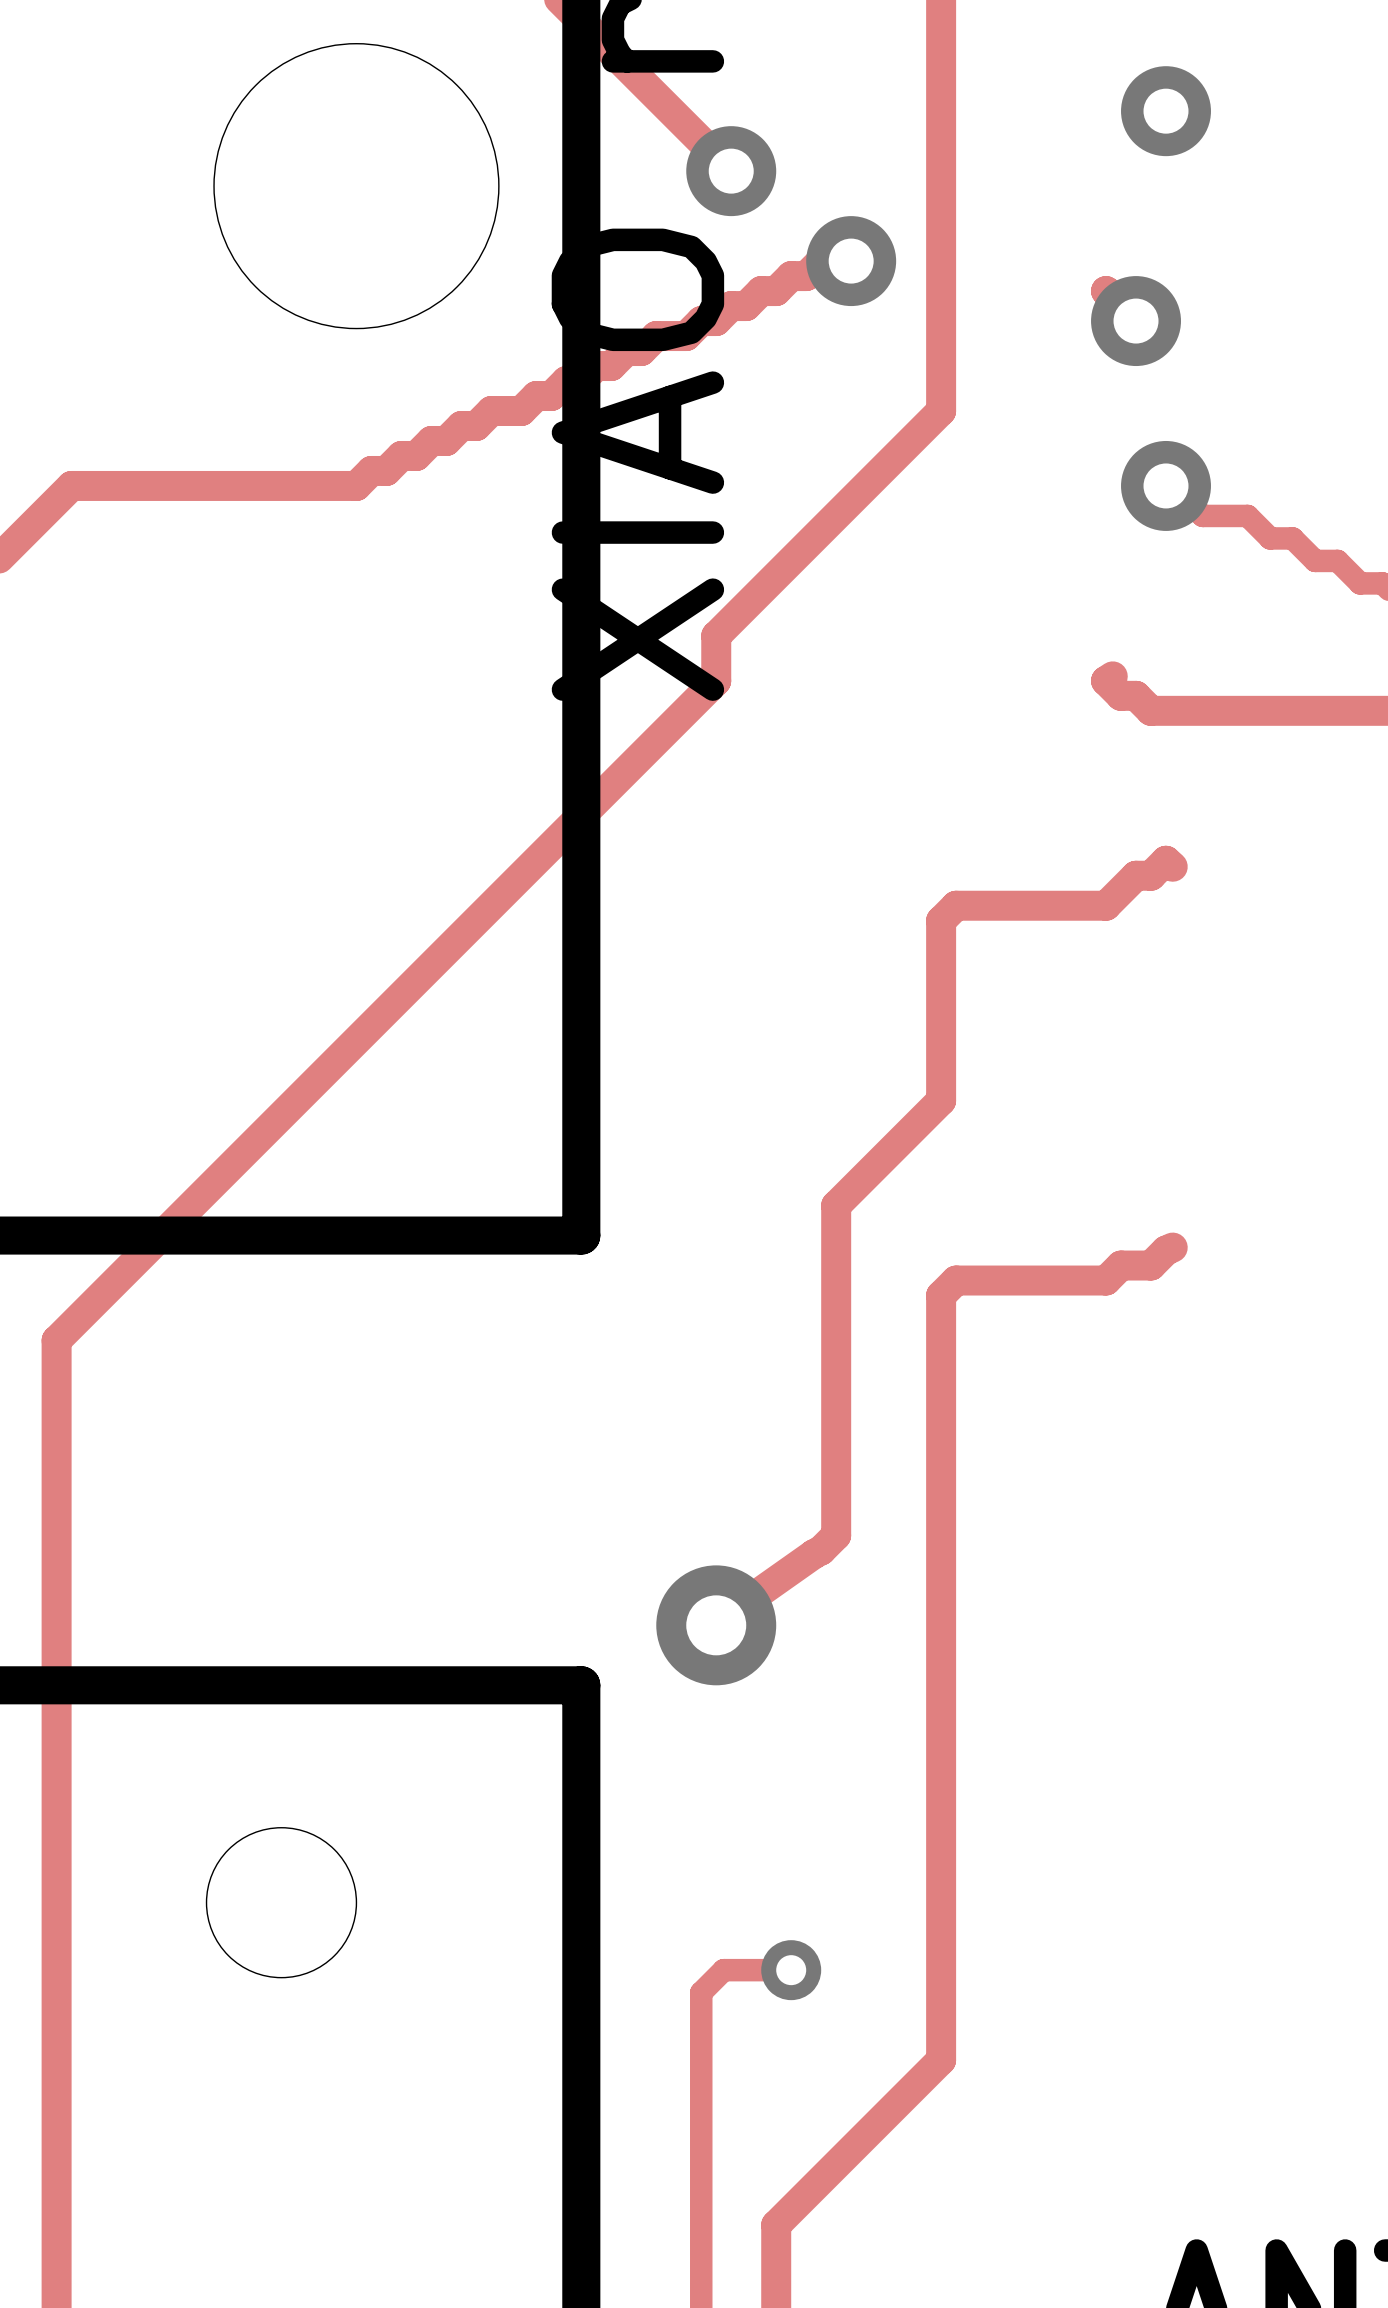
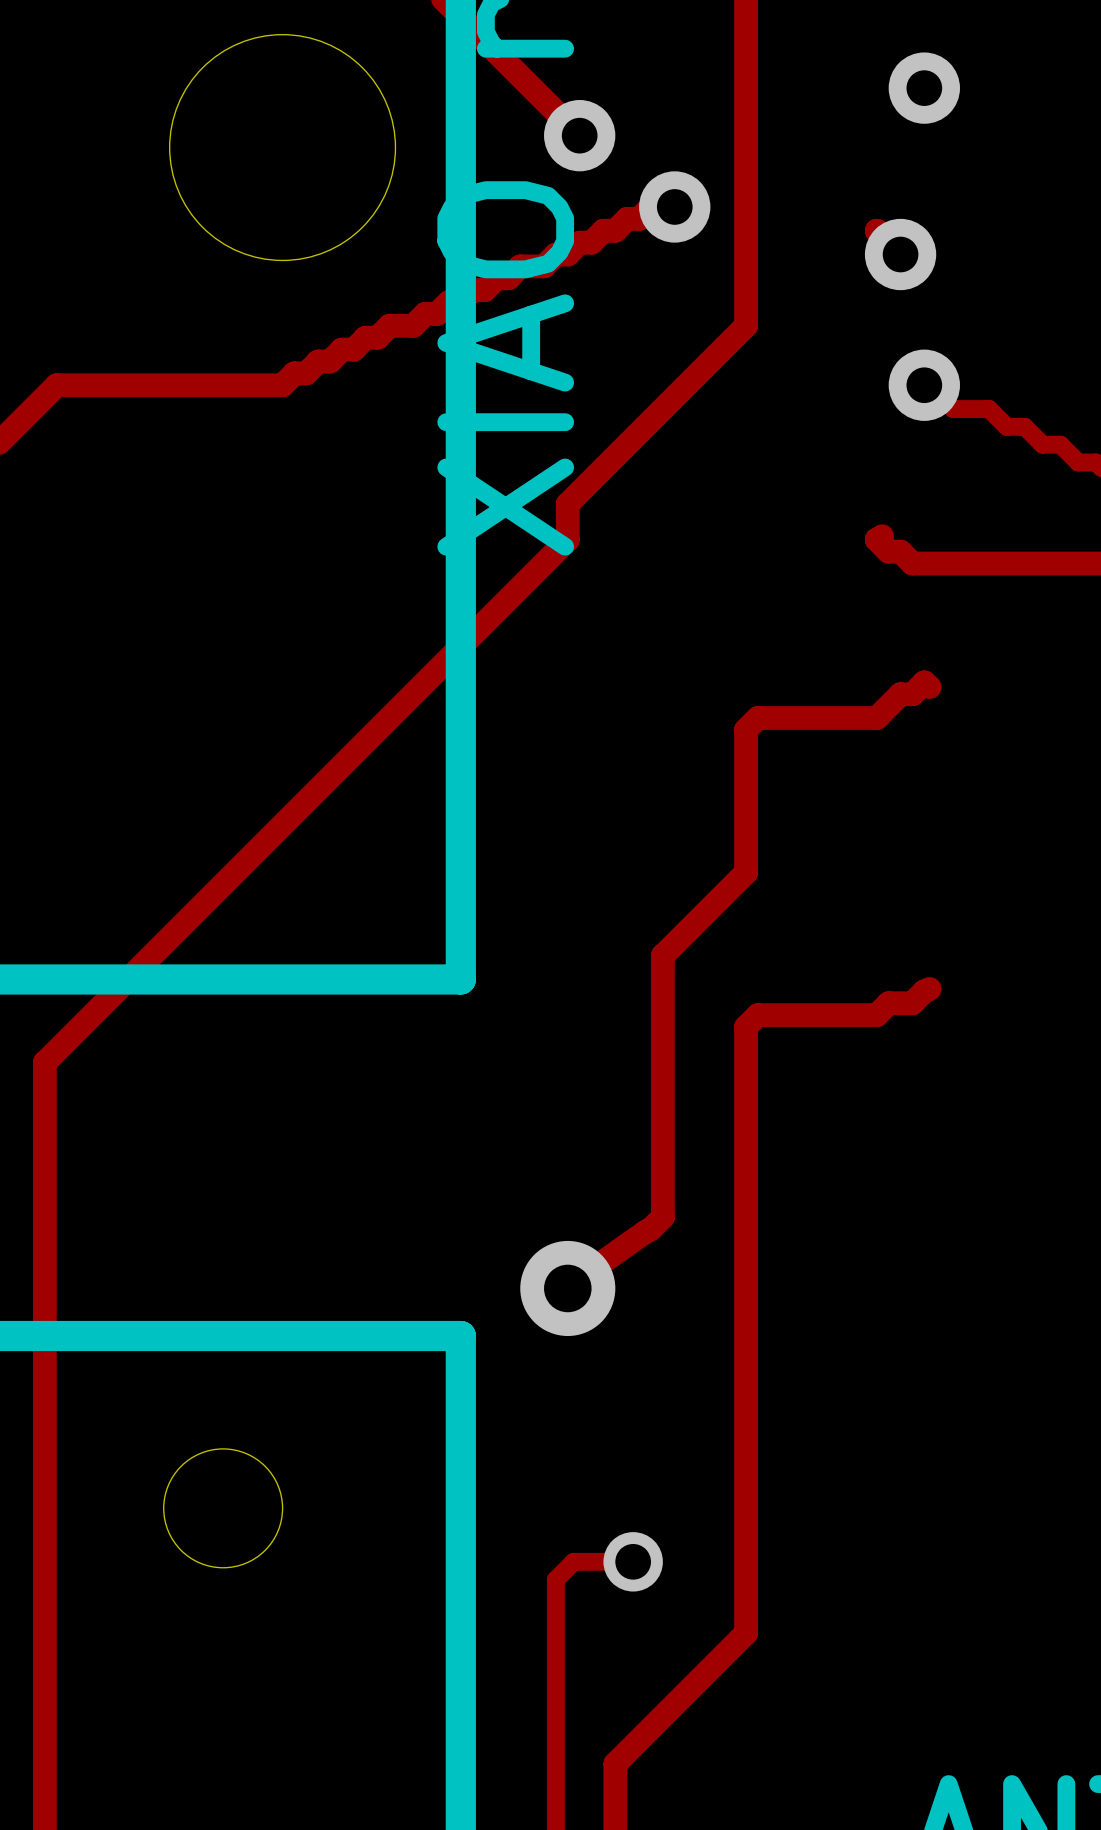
via size: [761, 1940, 822, 2001] -> [603, 1532, 663, 1592]

